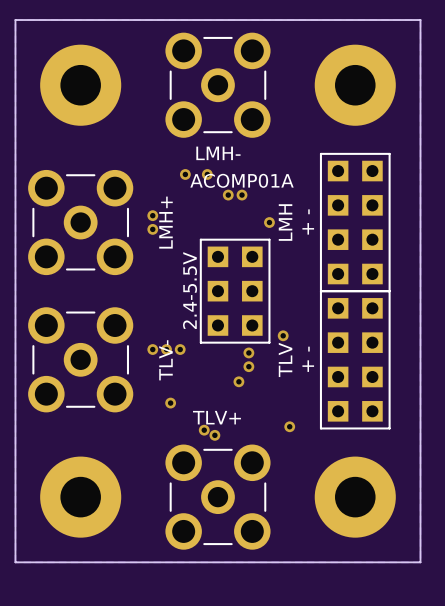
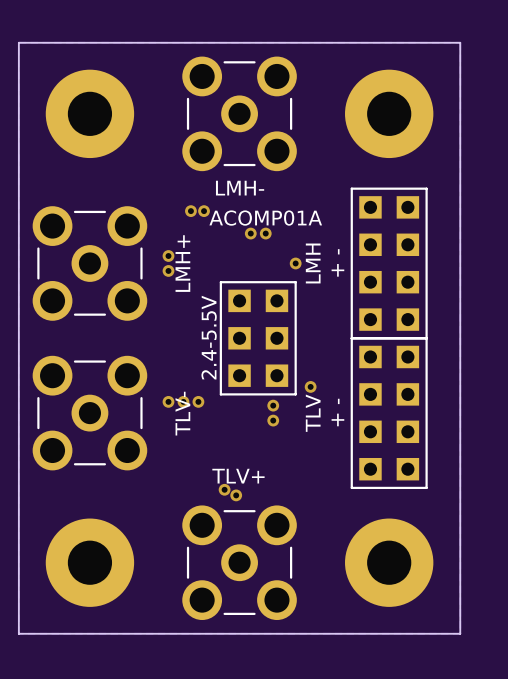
via position: (207, 174) -> (190, 211)
via: (238, 381) -> none
via: (170, 403) -> none
via: (289, 426) -> none

